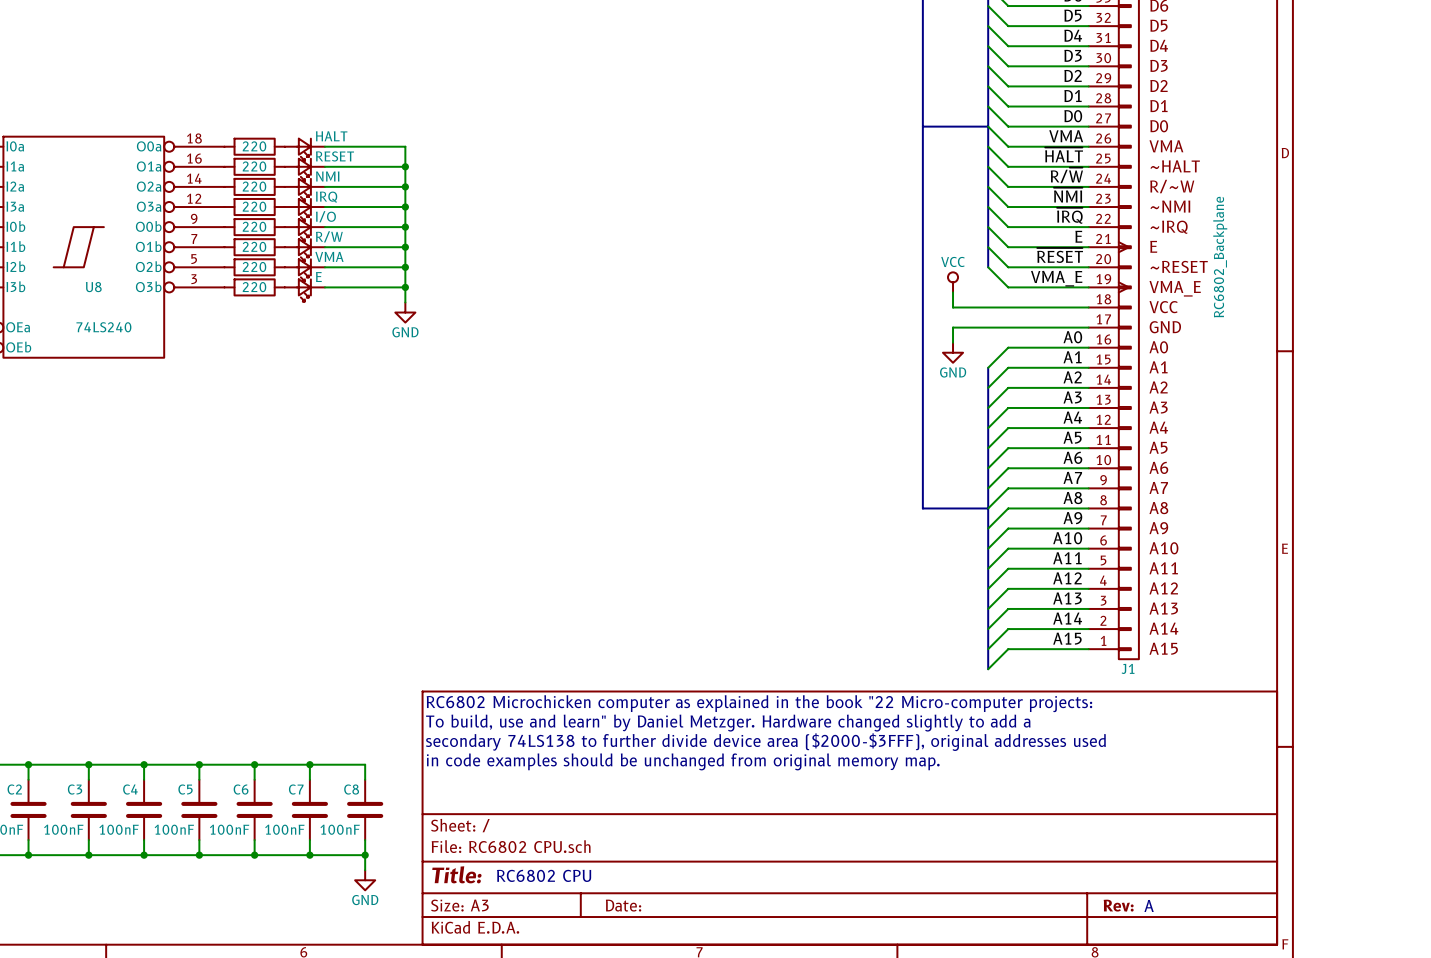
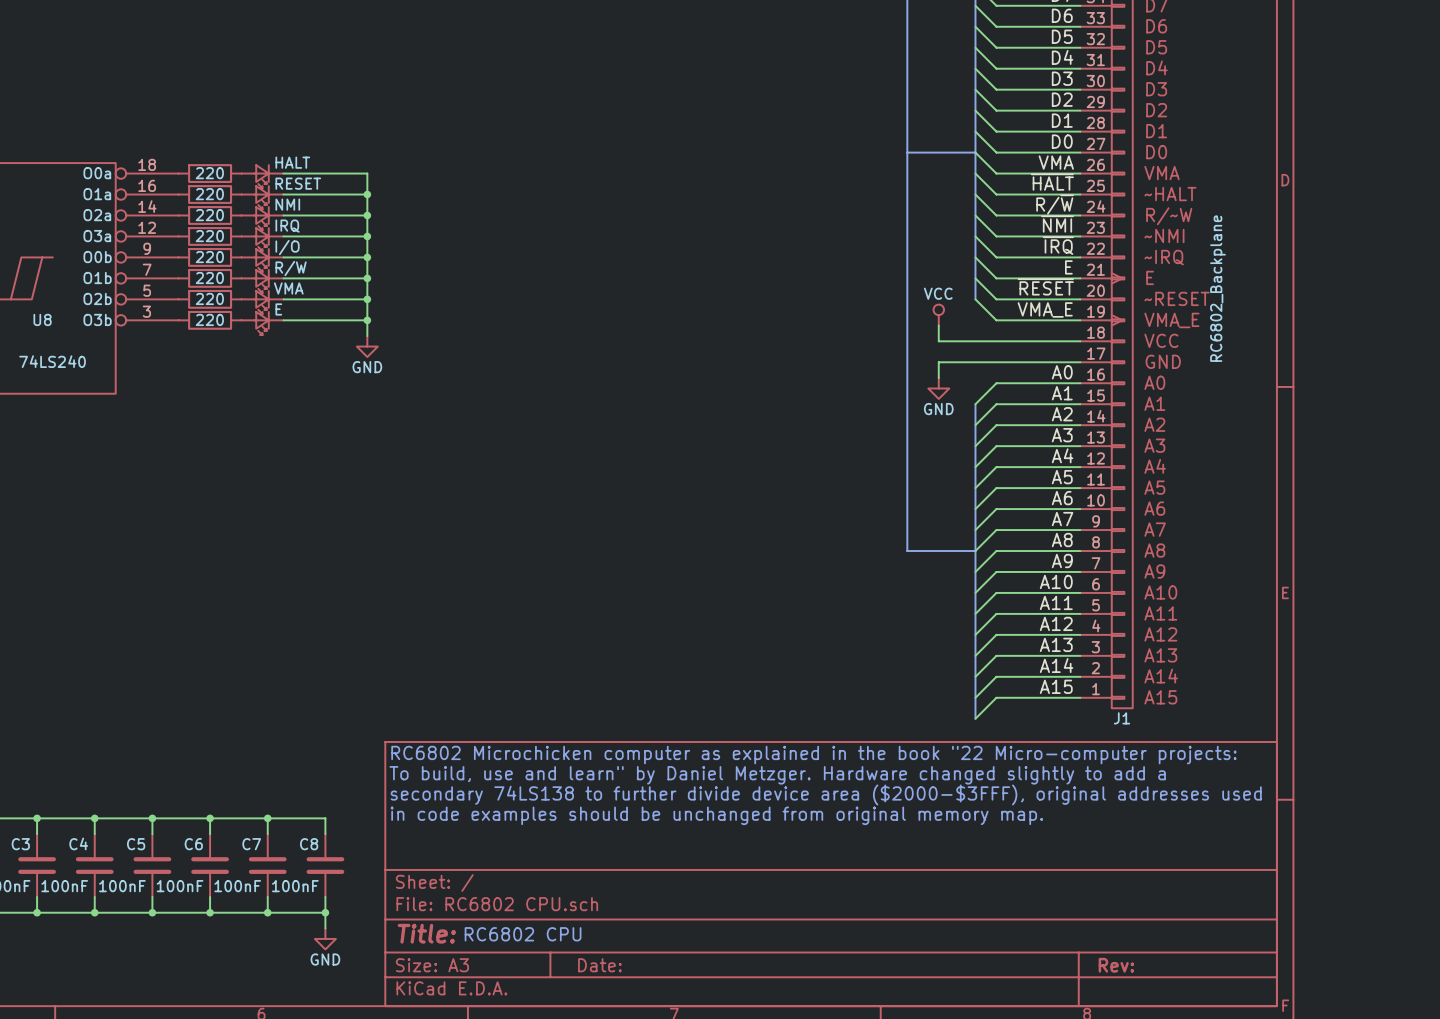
text: A (1149, 905) -> none

